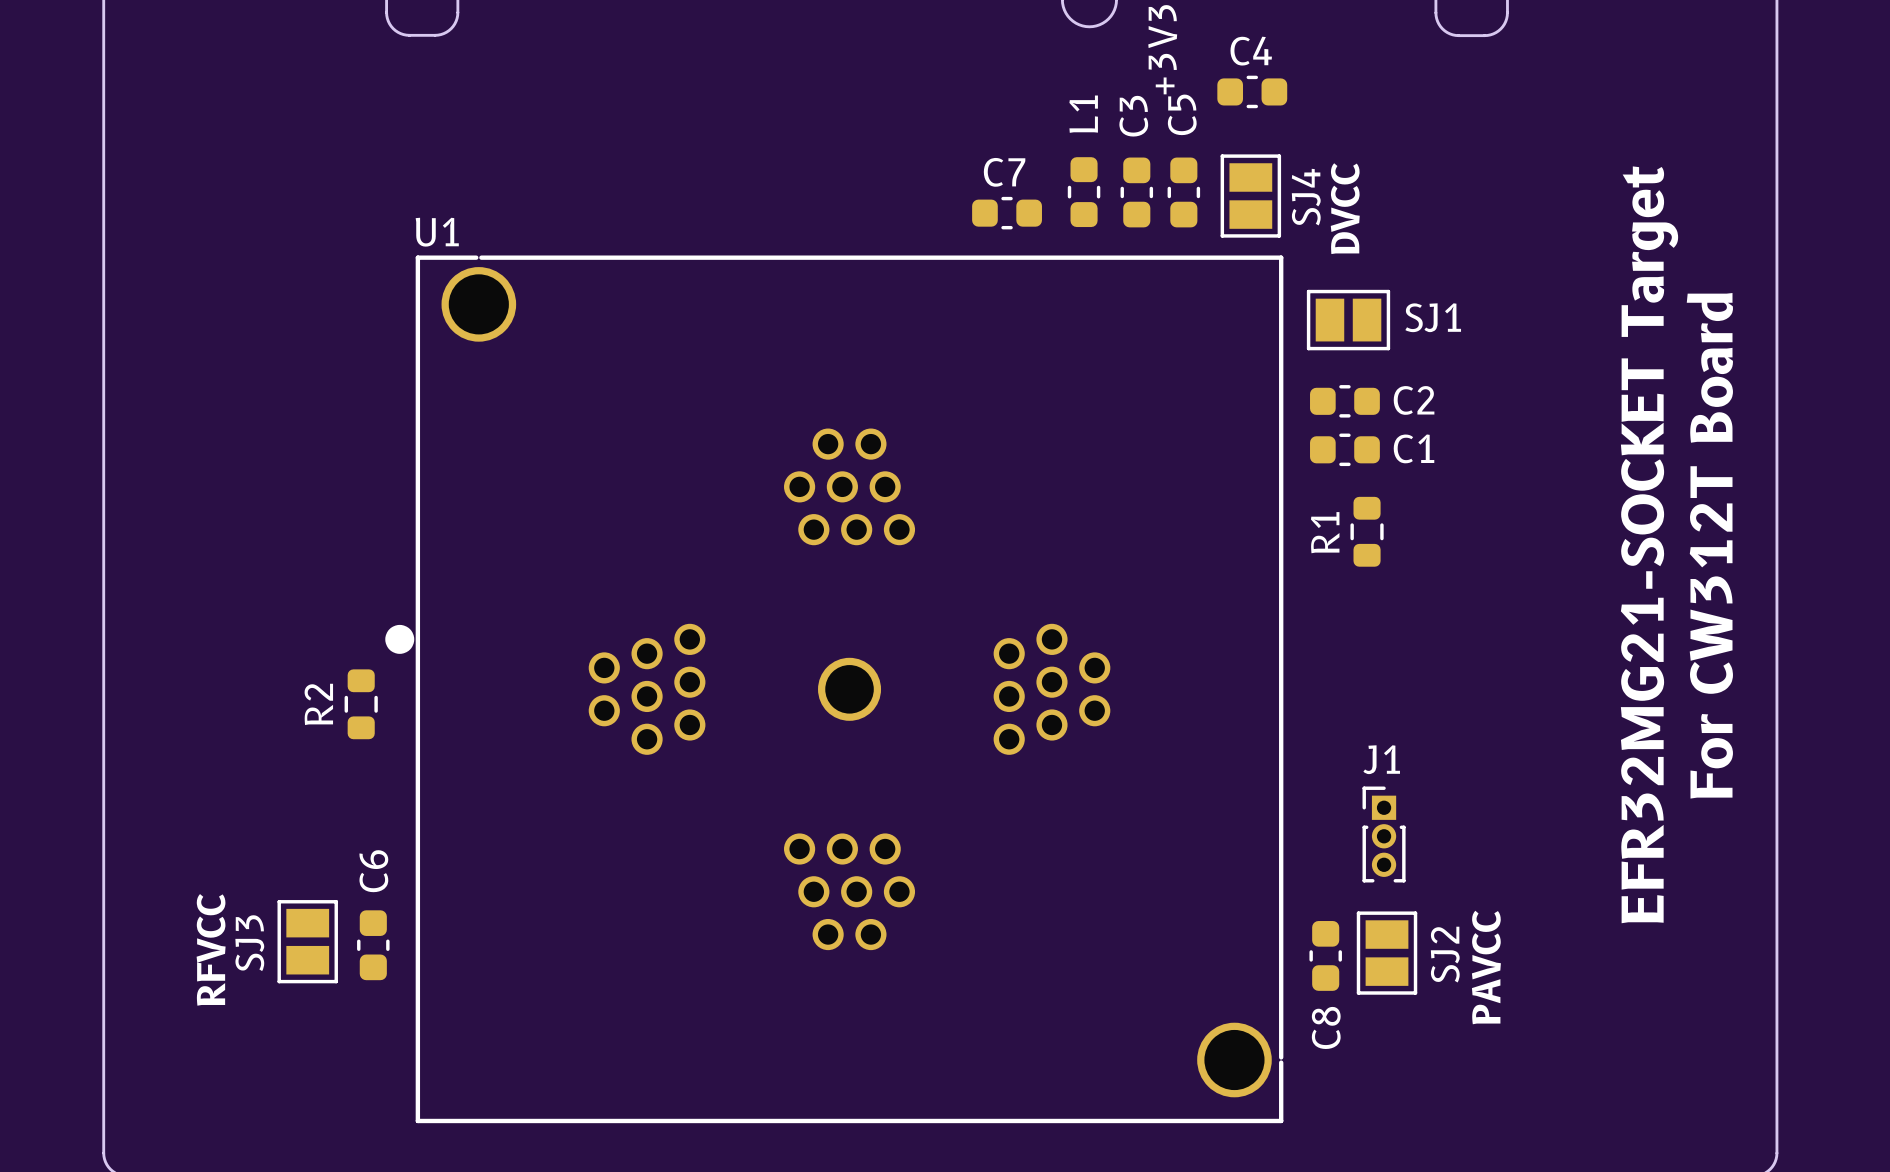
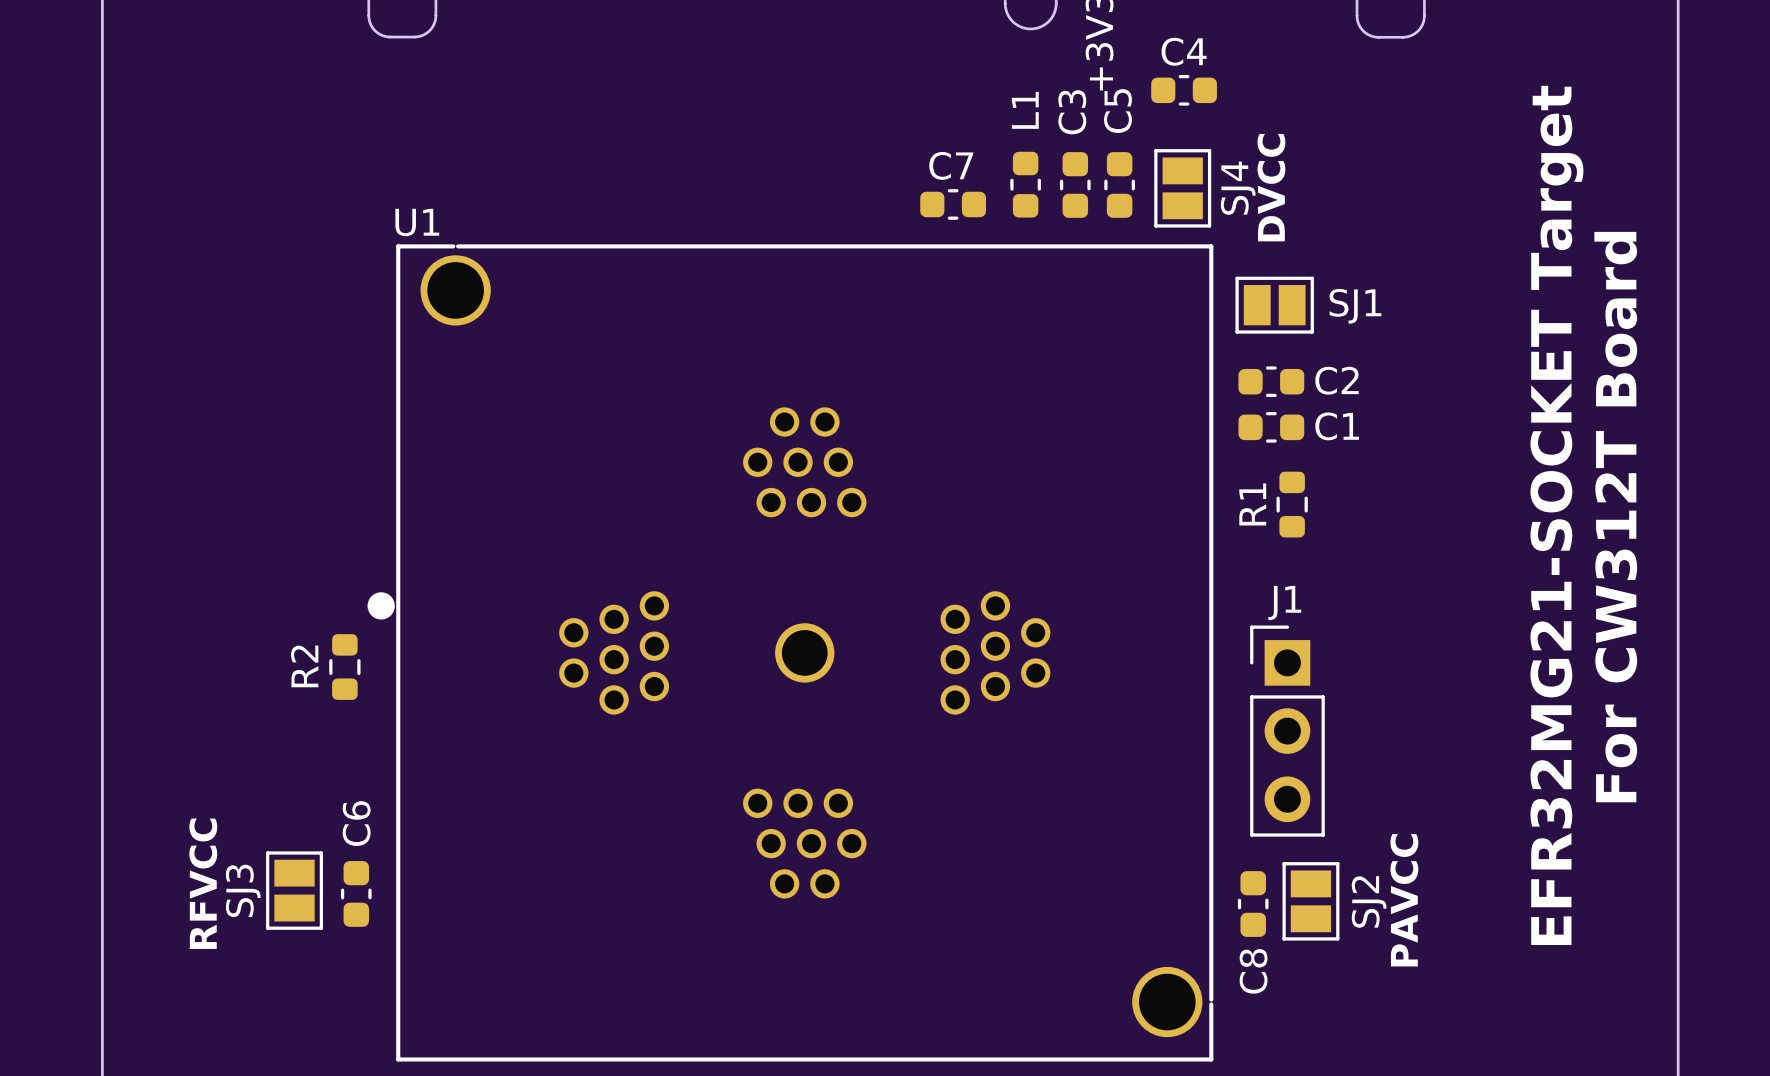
J1 name position: J1 (1381, 759) -> J1 (1284, 602)
J1 footprint: [1362, 786, 1406, 883] -> [1250, 625, 1325, 837]

